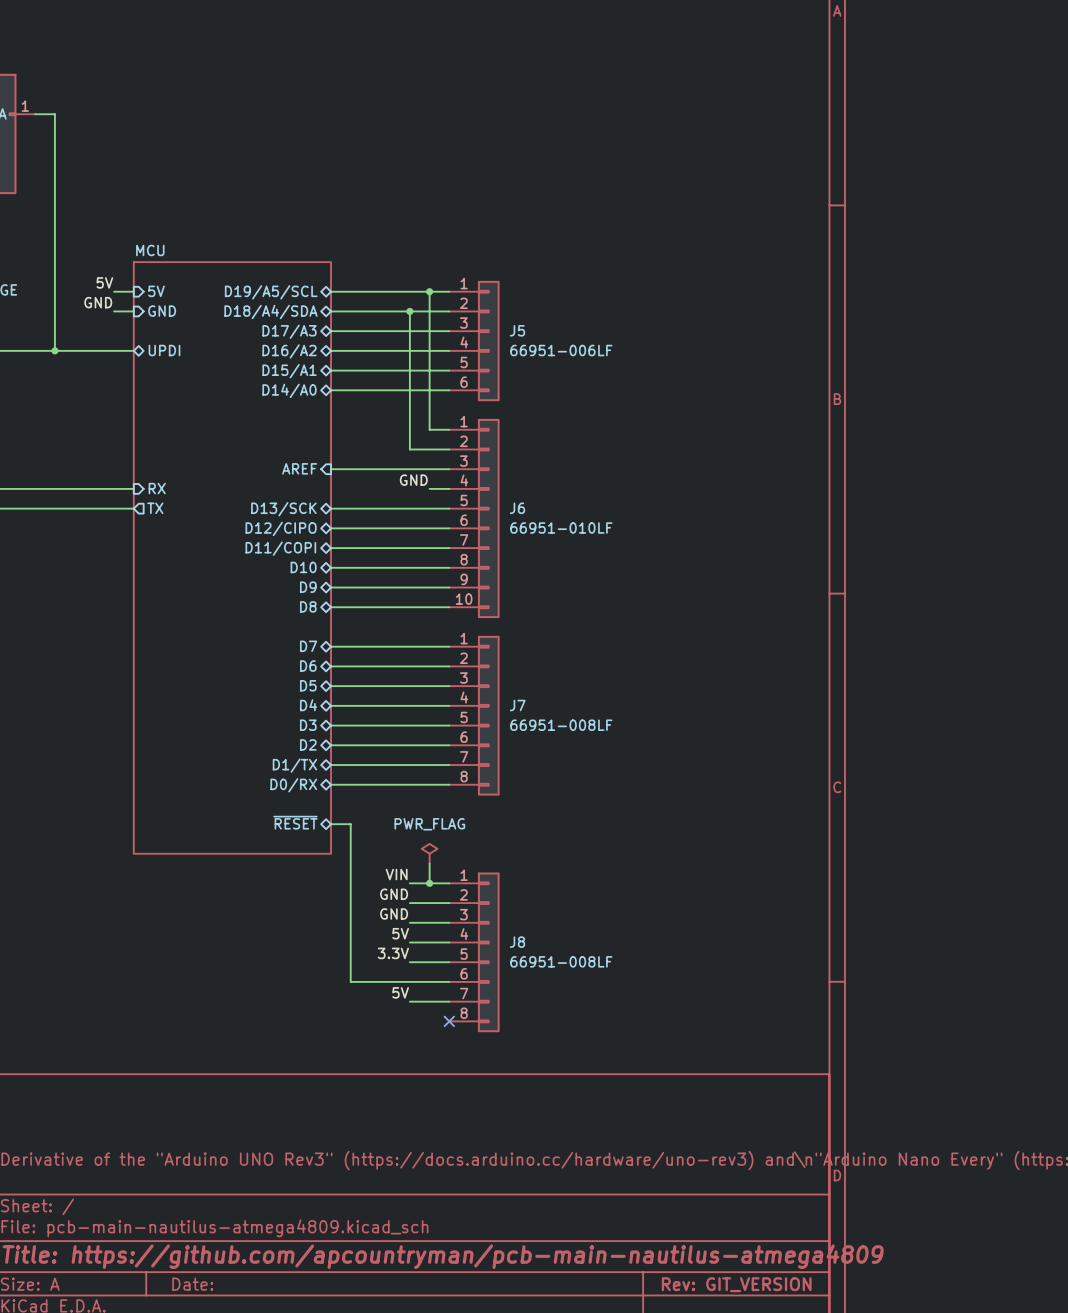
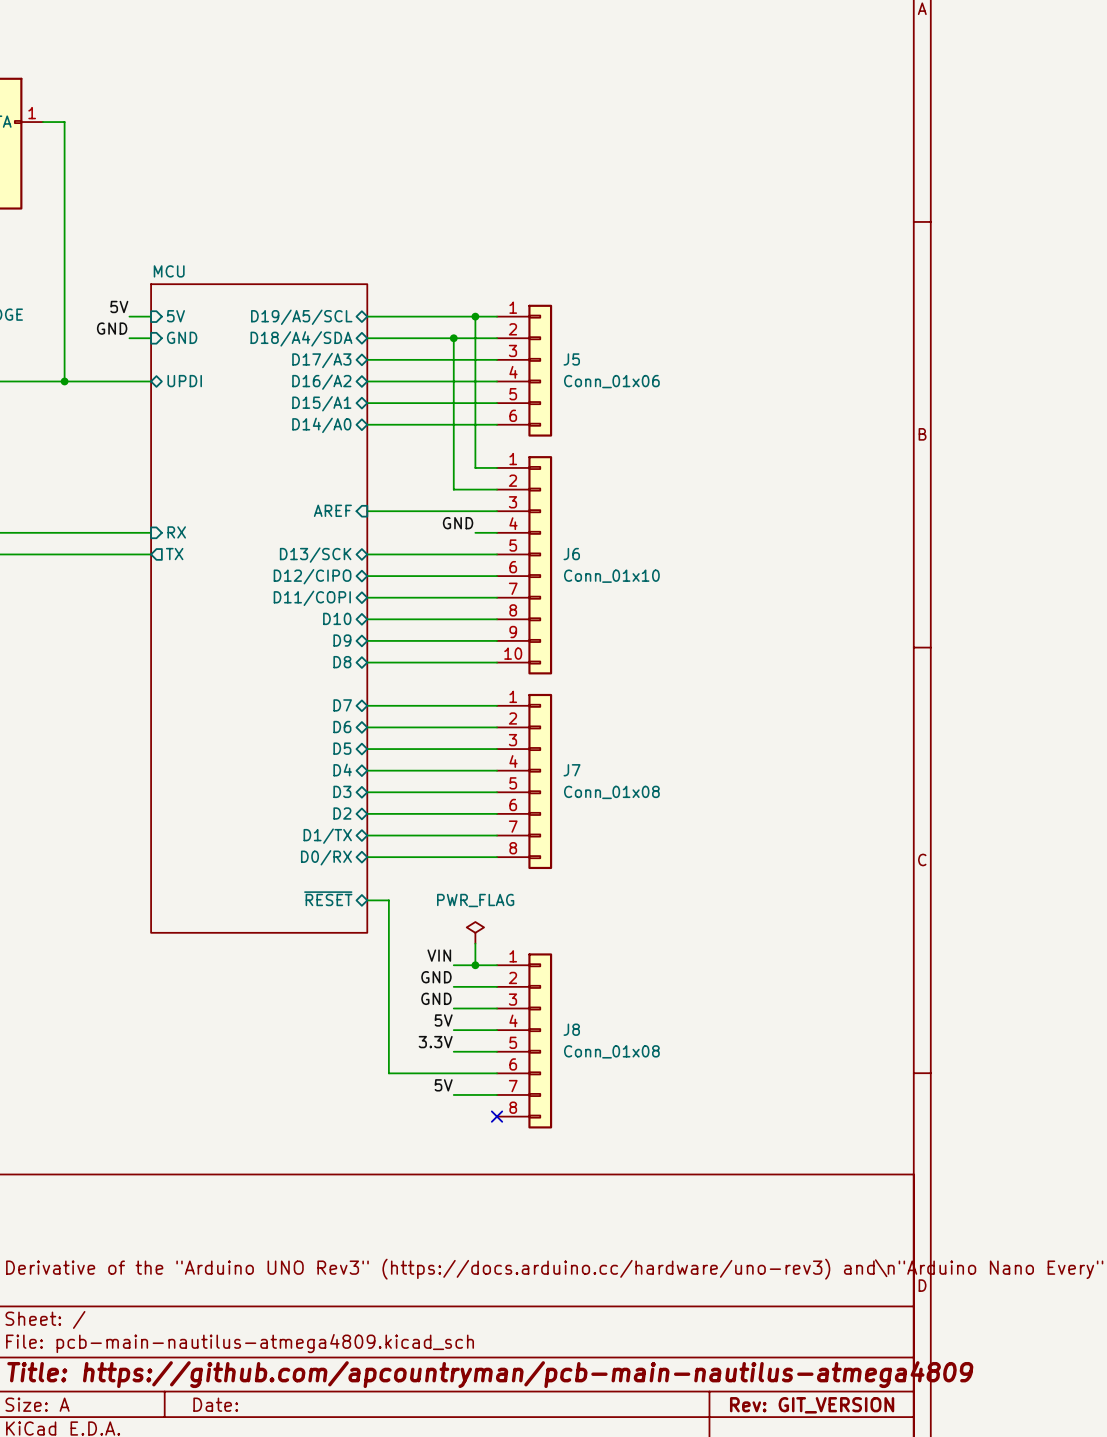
J5 value: 66951-006LF (561, 350) -> Conn_01x06 (611, 381)
J6 value: 66951-010LF (561, 528) -> Conn_01x10 (611, 576)
J7 value: 66951-008LF (561, 725) -> Conn_01x08 (611, 792)
J8 value: 66951-008LF (561, 961) -> Conn_01x08 (611, 1051)

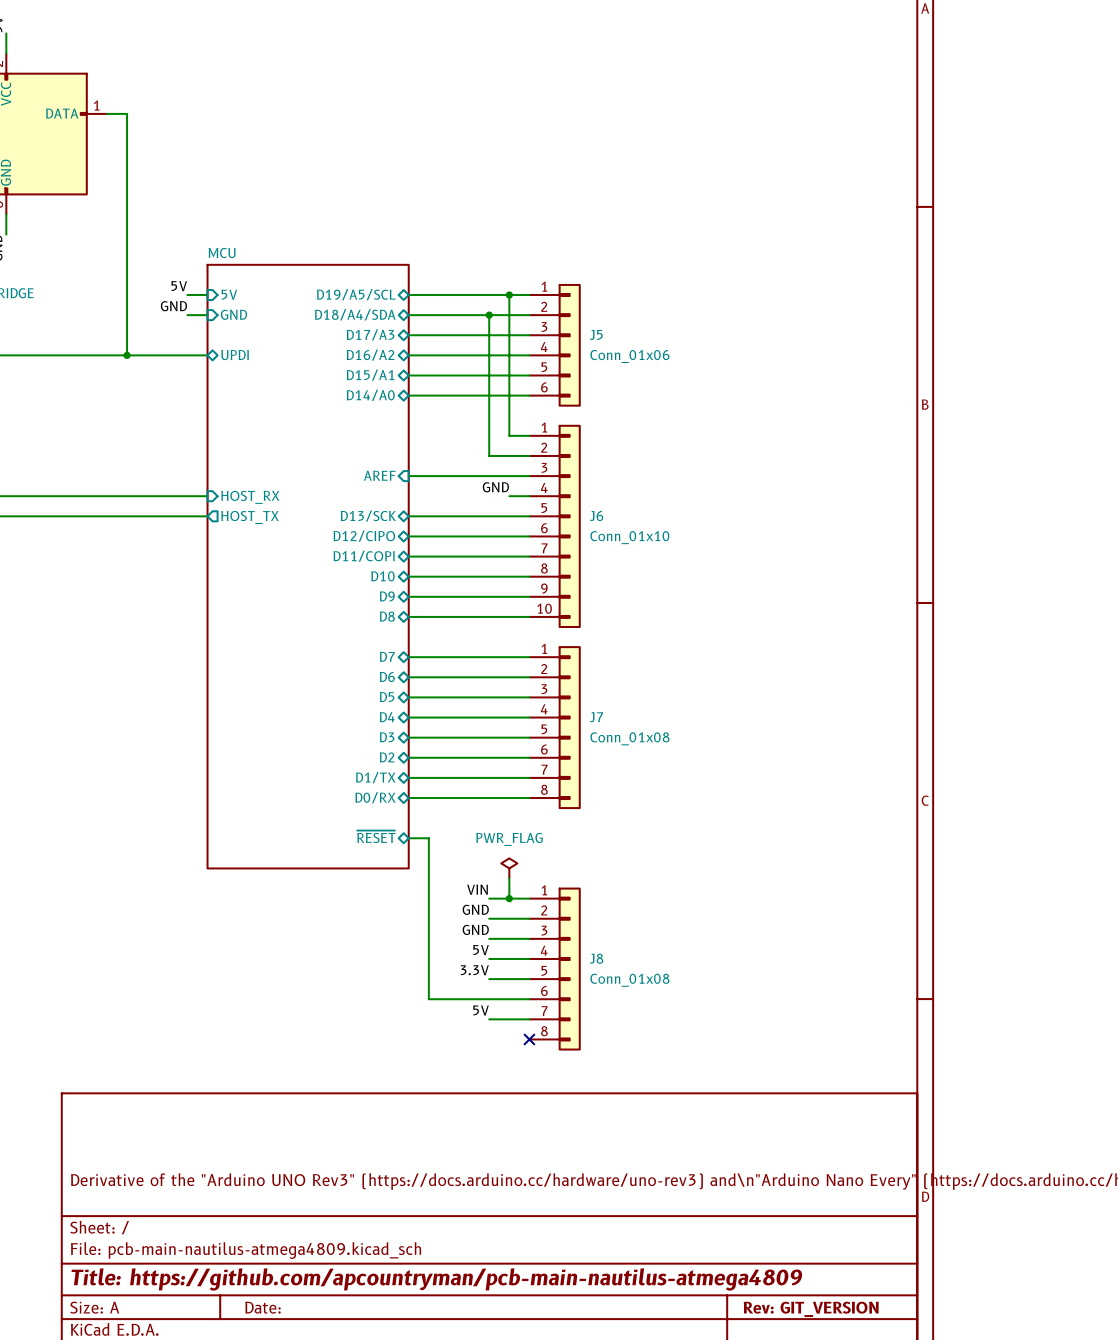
sheet pin: RX (176, 532) -> HOST_RX (250, 497)
sheet pin: TX (174, 554) -> HOST_TX (250, 517)

